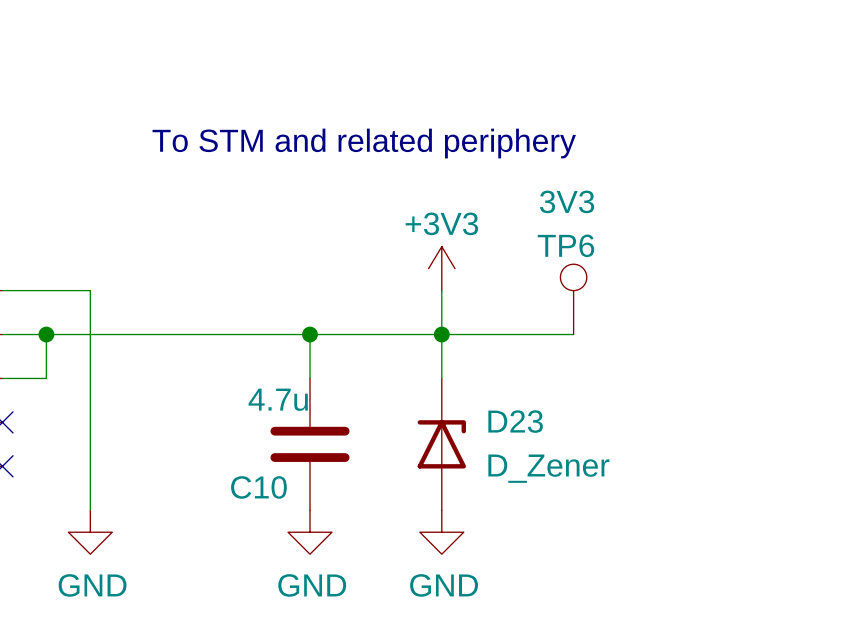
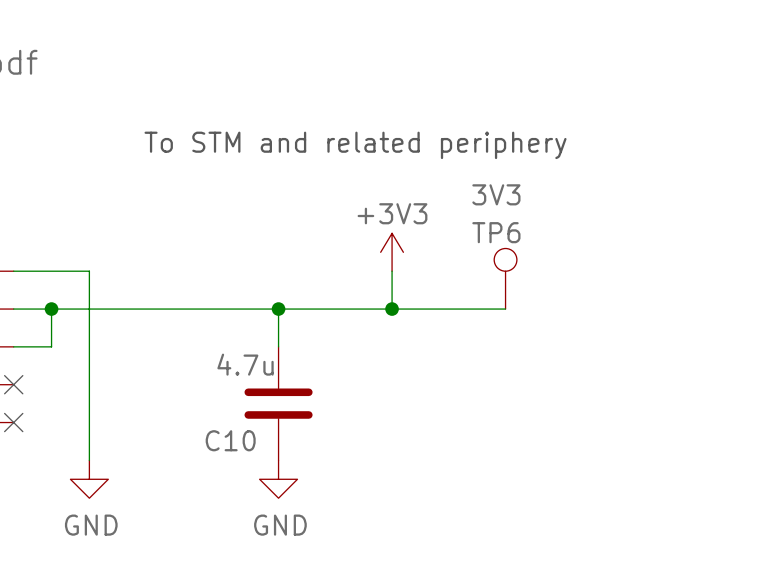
wire: (441, 334) (441, 378) -> none
D23: D_Zener (441, 444) -> none
power symbol: GND (441, 532) -> none

